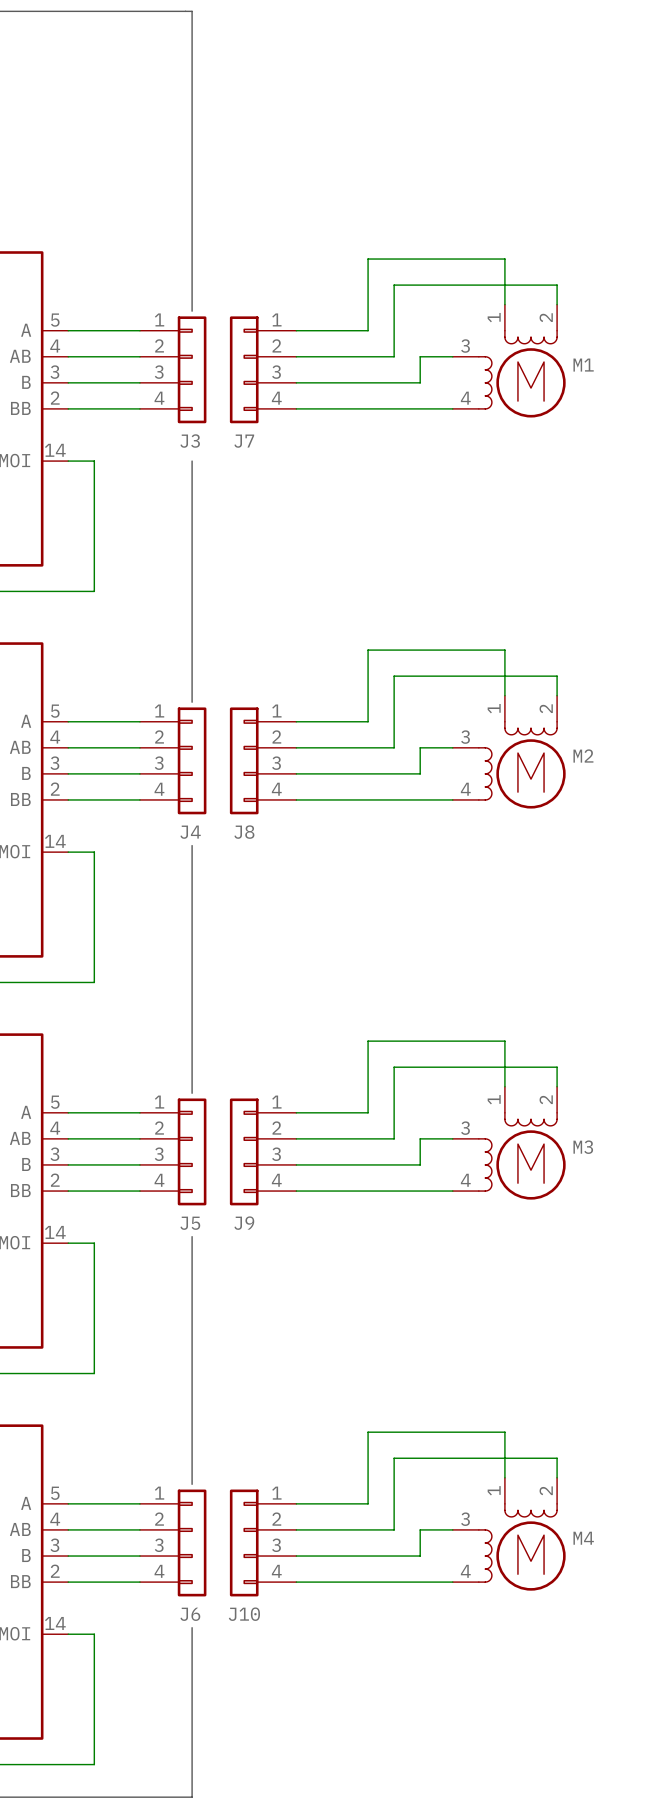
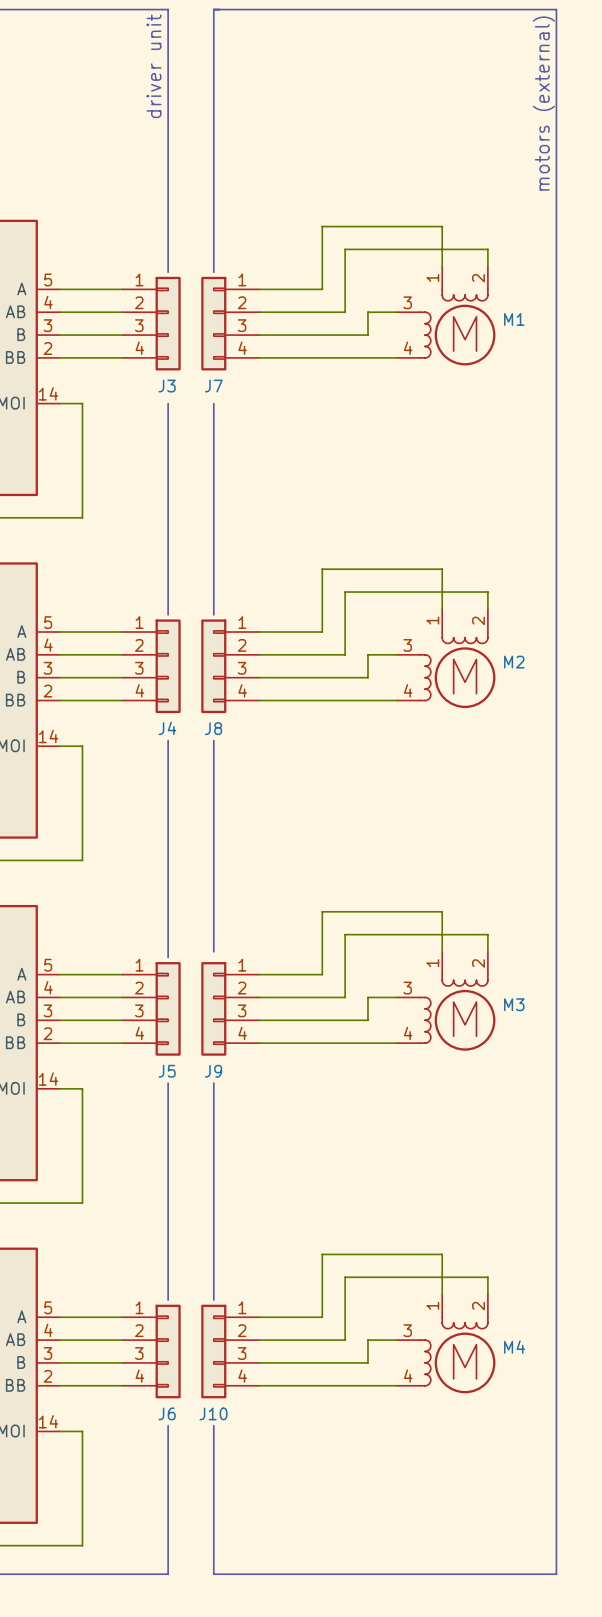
text: none -> driver unit (154, 66)
text: none -> motors (external) (543, 103)
line: none -> (213, 272) (213, 9) (556, 9) (556, 1574) (213, 1574) (213, 1425)
line: none -> (213, 403) (213, 614)
line: none -> (213, 740) (213, 951)
line: none -> (213, 1083) (213, 1300)

